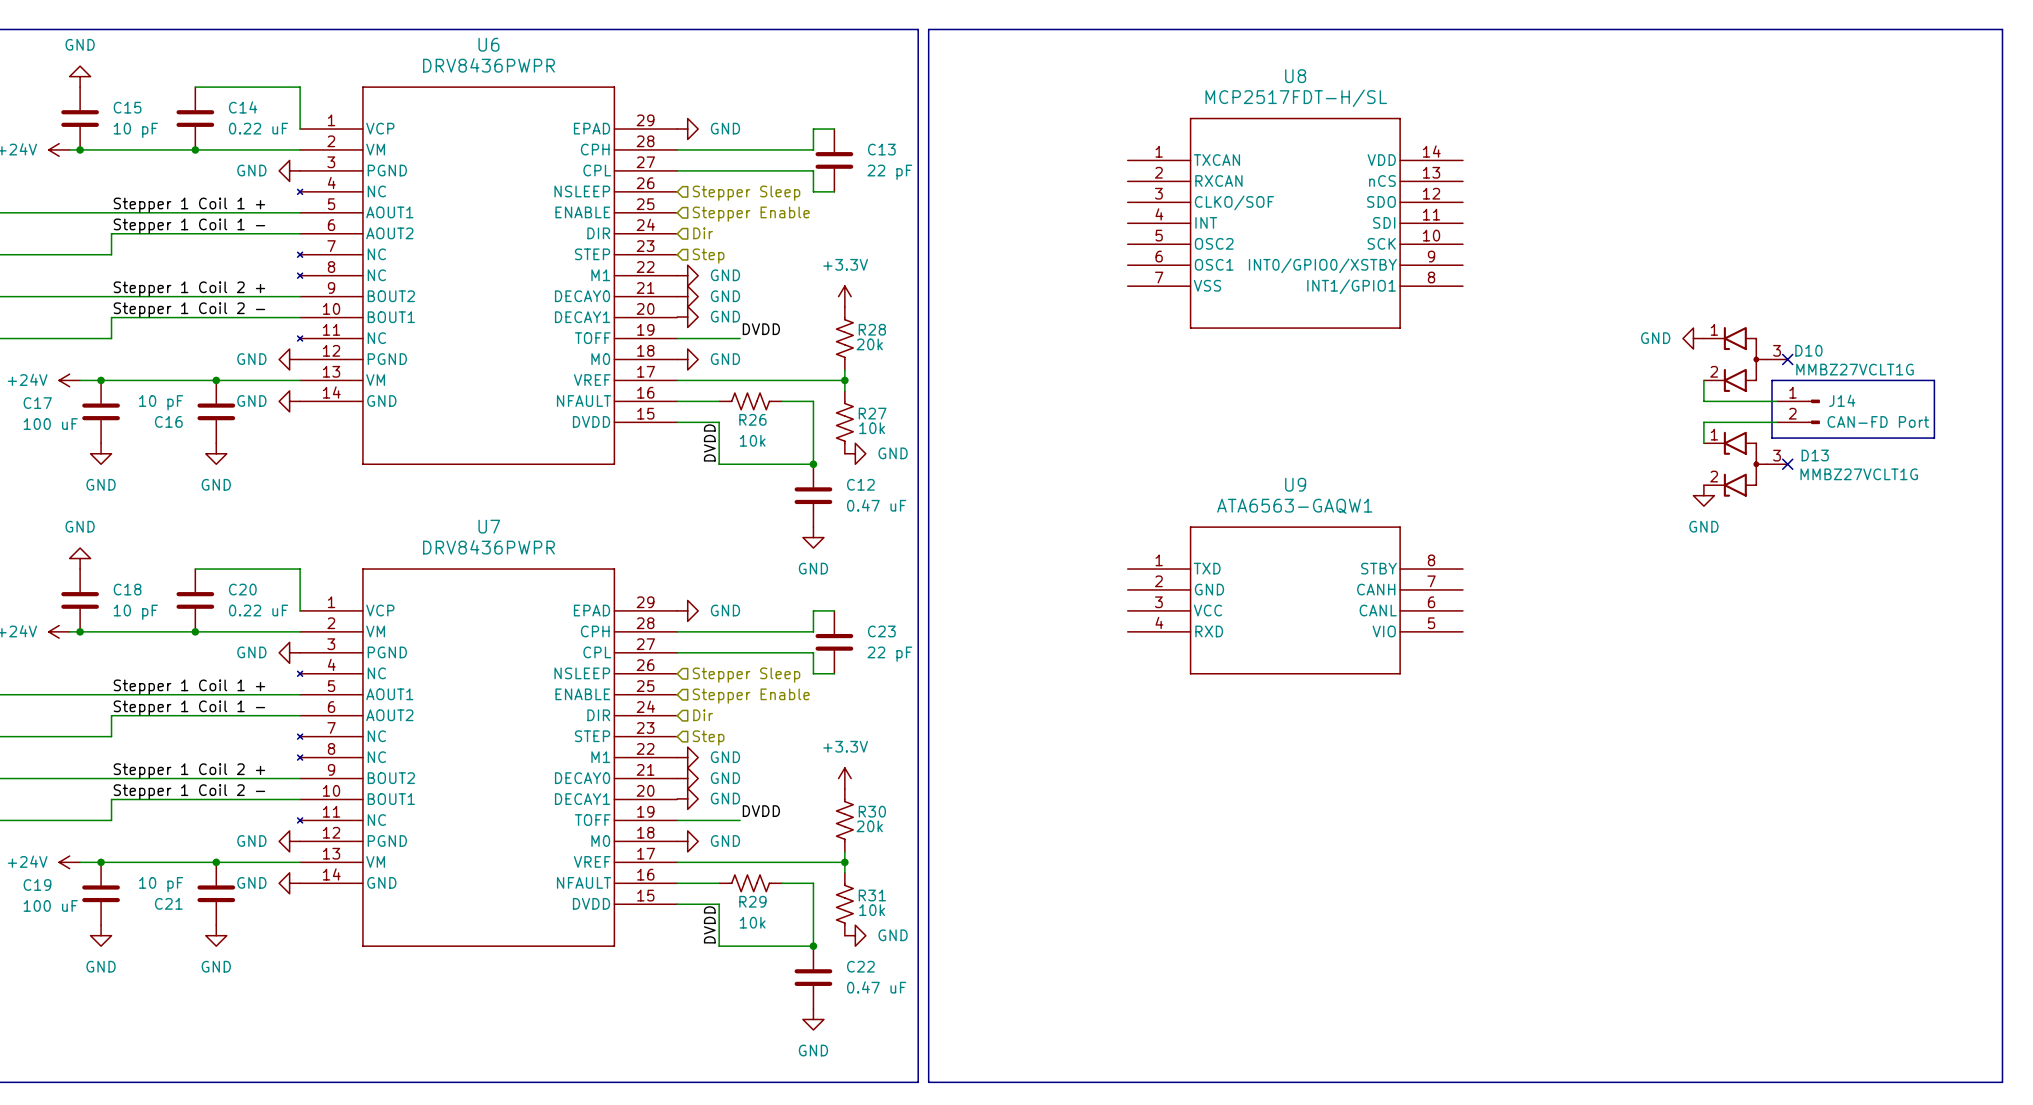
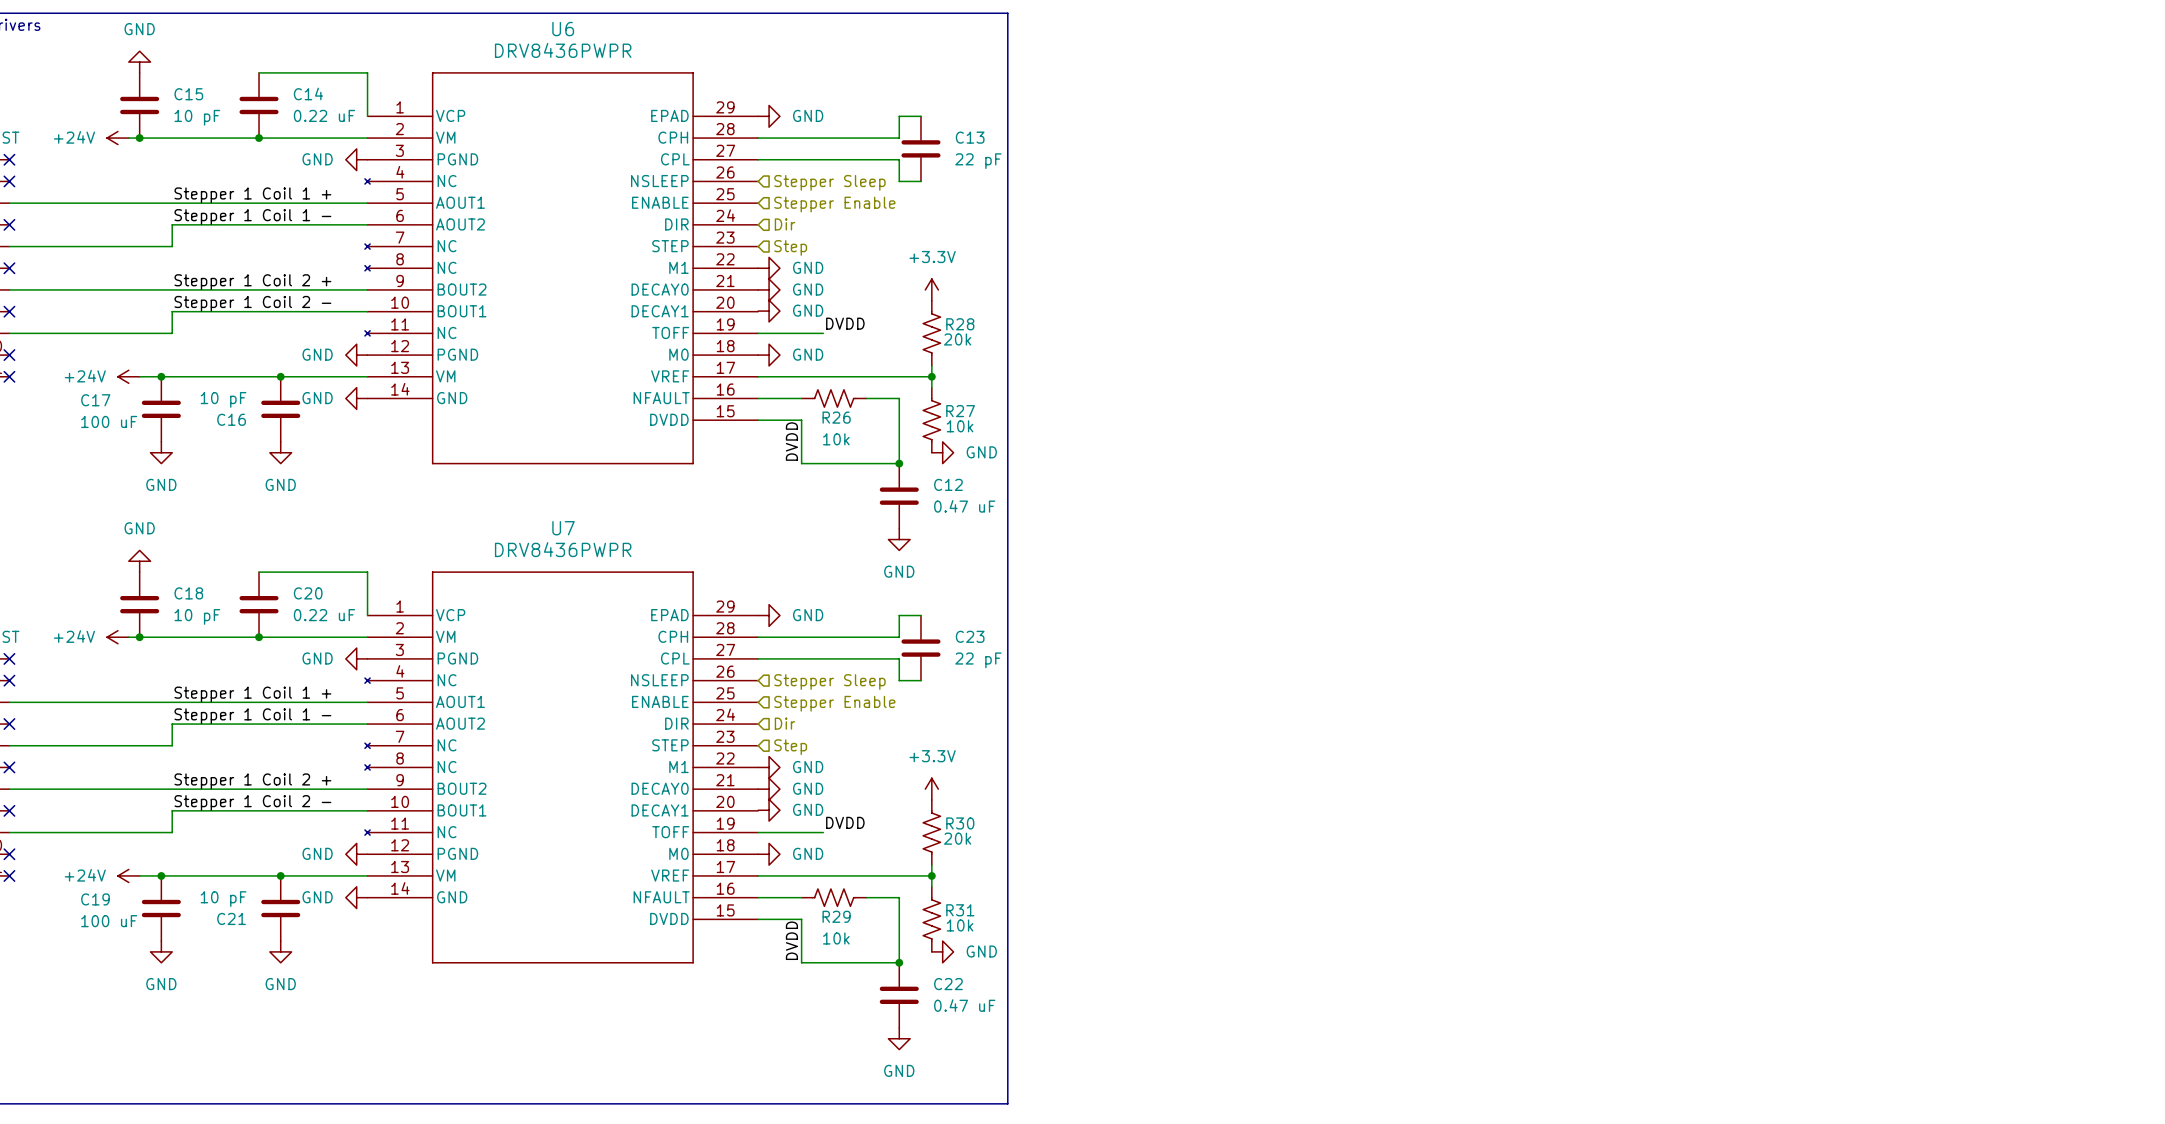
line: (928, 29) (2002, 29) (2002, 1082) (928, 1082) (928, 29) -> none
U8: MCP2517FDT-H/SL (1295, 223) -> none
power symbol: GND (1693, 338) -> none
D10: MMBZ27VCLT1G (1745, 359) -> none
no-connect mark: (1787, 359) -> none
wire: (1703, 380) (1703, 401) (1777, 401) -> none
line: (1772, 380) (1934, 380) (1934, 438) (1772, 438) (1772, 380) -> none
J14: CAN-FD Port (1798, 411) -> none
wire: (1777, 422) (1703, 422) (1703, 443) -> none
D13: MMBZ27VCLT1G (1745, 464) -> none
no-connect mark: (1787, 464) -> none
power symbol: GND (1703, 495) -> none
U9: ATA6563-GAQW1 (1295, 600) -> none

